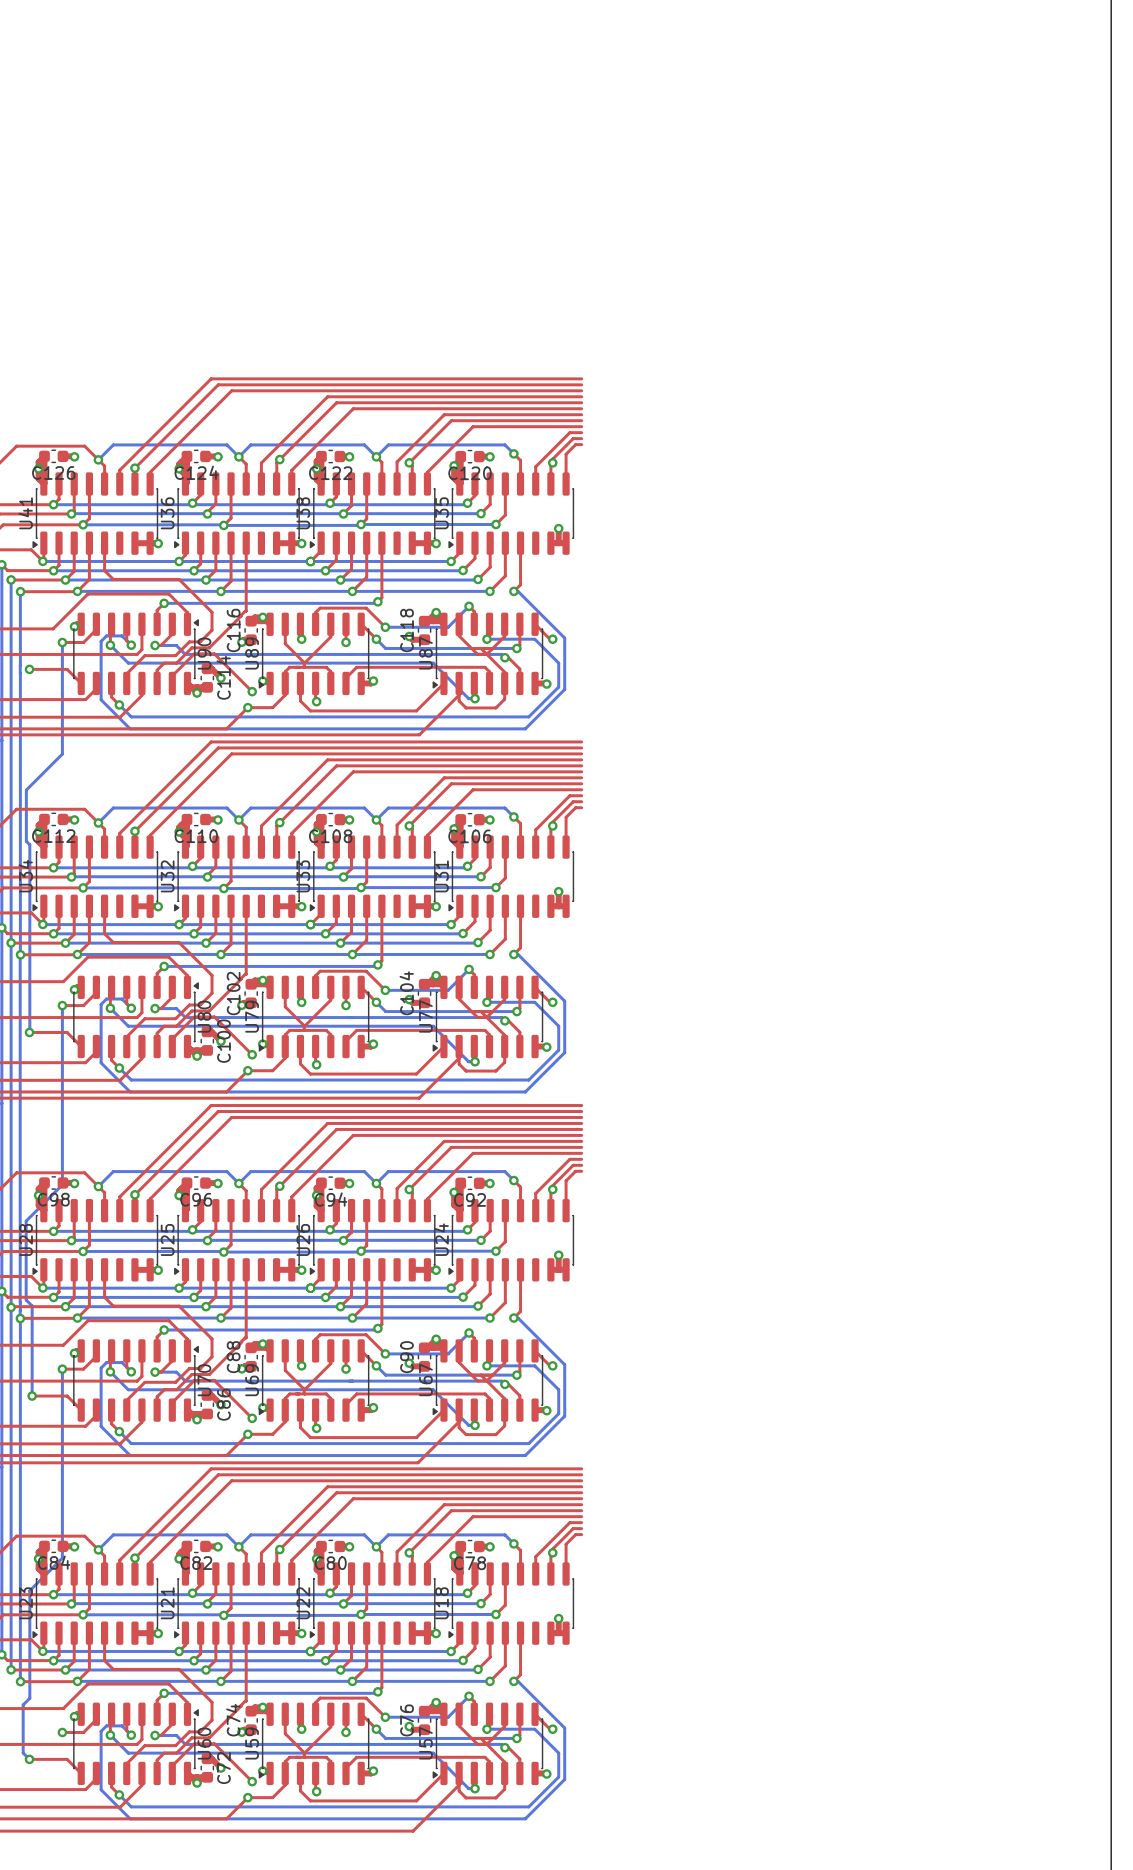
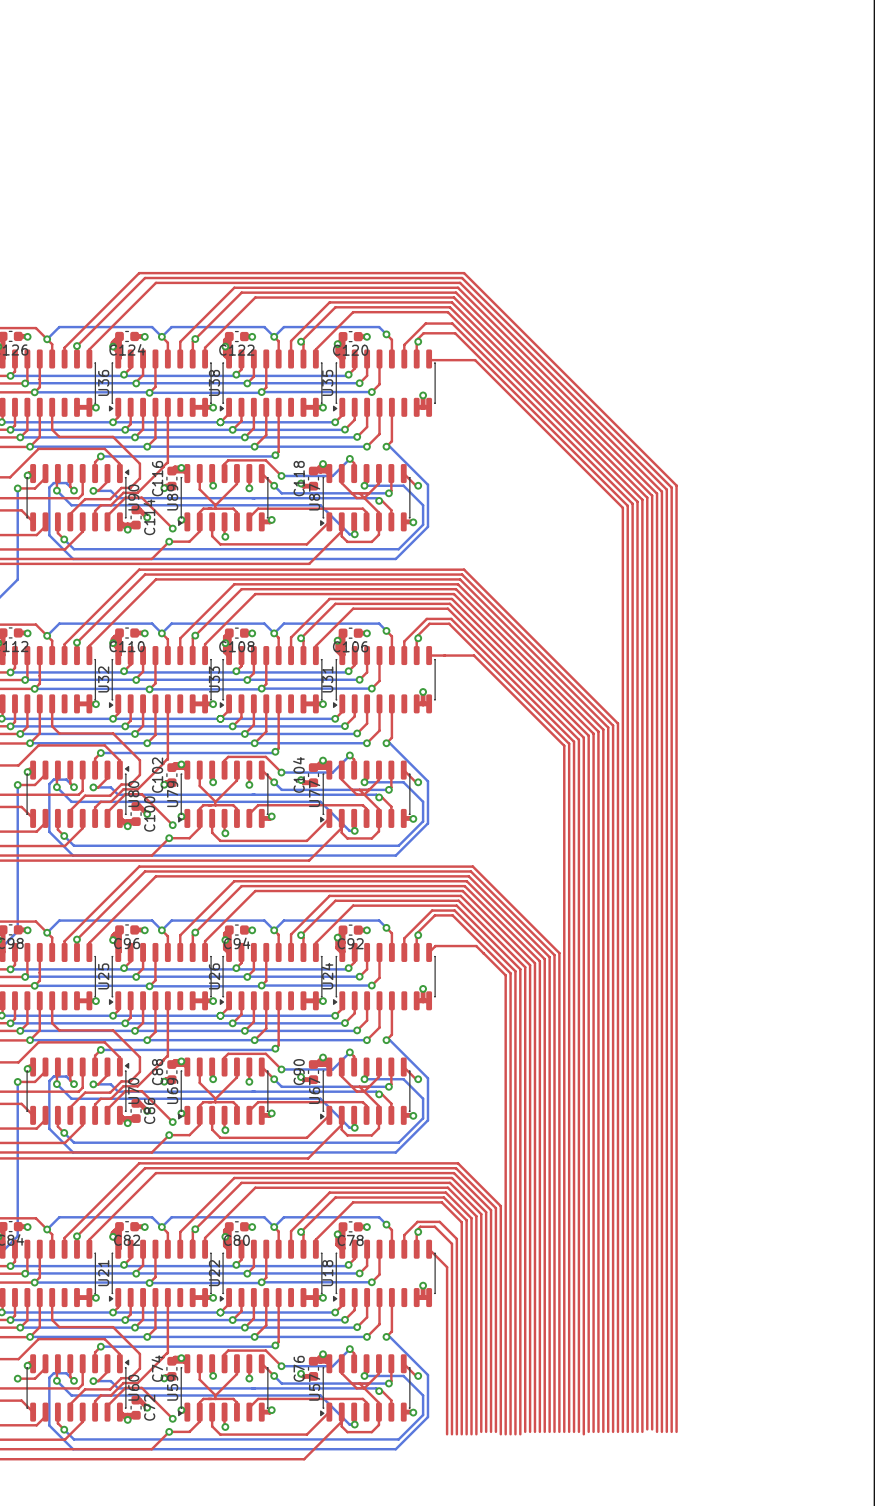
top track: none -> (441, 273) (464, 273) (676, 485) (676, 1431)
top track: none -> (441, 278) (462, 278) (671, 487) (671, 1431)
top track: none -> (441, 282) (460, 282) (666, 489) (666, 1431)
top track: none -> (441, 287) (458, 287) (661, 491) (661, 1431)
top track: none -> (441, 292) (456, 292) (657, 493) (657, 1431)
top track: none -> (441, 297) (453, 297) (652, 495) (652, 1429)
top track: none -> (441, 302) (451, 302) (647, 497) (647, 1429)
top track: none -> (441, 307) (449, 307) (642, 499) (642, 1431)
top track: none -> (441, 312) (447, 312) (637, 501) (637, 1431)
top track: (581, 432) (569, 432) (561, 440) -> (632, 1431) (632, 503) (452, 323) (425, 323)
top track: (581, 438) (573, 438) (559, 452) -> (627, 1431) (627, 505) (455, 333) (423, 333)
top track: (581, 444) (575, 444) (566, 454) (566, 484) -> (622, 1431) (622, 507) (475, 360) (429, 358)
top track: none -> (441, 569) (464, 569) (617, 723) (617, 1431)
top track: none -> (441, 574) (462, 574) (613, 725) (613, 1431)
top track: none -> (441, 579) (460, 579) (608, 727) (608, 1431)
top track: none -> (441, 584) (458, 584) (603, 729) (603, 1431)
top track: none -> (441, 589) (456, 589) (598, 731) (598, 1431)
top track: none -> (441, 594) (453, 594) (593, 733) (593, 1431)
top track: none -> (441, 598) (451, 598) (588, 735) (588, 1431)
top track: none -> (441, 603) (449, 603) (583, 737) (583, 1434)
top track: none -> (441, 608) (447, 608) (578, 739) (578, 1431)
top track: (581, 795) (569, 795) (563, 802) -> (574, 1431) (574, 741) (451, 618) (426, 618)
top track: (581, 801) (573, 801) (566, 808) -> (569, 1431) (569, 743) (449, 623) (429, 623)
top track: (581, 807) (575, 807) (566, 817) (566, 847) -> (564, 1431) (564, 745) (474, 655) (429, 655)
top track: none -> (441, 866) (472, 866) (559, 953) (559, 1431)
top track: none -> (441, 871) (470, 871) (554, 955) (554, 1431)
top track: none -> (441, 876) (468, 876) (549, 957) (549, 1431)
top track: none -> (441, 881) (466, 881) (544, 959) (544, 1431)
top track: none -> (441, 886) (464, 886) (539, 961) (539, 1431)
top track: none -> (441, 891) (462, 891) (534, 963) (534, 1431)
top track: none -> (441, 895) (460, 895) (530, 965) (530, 1431)
top track: none -> (441, 900) (458, 900) (525, 967) (525, 1431)
top track: none -> (441, 905) (456, 905) (520, 969) (520, 1434)
top track: none -> (441, 910) (454, 910) (515, 971) (515, 1434)
top track: none -> (441, 915) (452, 915) (510, 973) (510, 1434)
top track: (581, 1171) (575, 1171) (566, 1180) (566, 1210) -> (483, 953) (476, 946) (435, 946) (429, 952)
top track: none -> (483, 953) (505, 975) (505, 1434)
top track: none -> (441, 1163) (458, 1163) (500, 1206) (500, 1434)
top track: none -> (441, 1168) (456, 1168) (495, 1208) (495, 1431)
top track: none -> (441, 1173) (453, 1173) (491, 1210) (491, 1431)
top track: none -> (441, 1177) (451, 1177) (486, 1212) (486, 1431)
top track: none -> (441, 1182) (449, 1182) (481, 1214) (481, 1431)
top track: none -> (441, 1187) (447, 1187) (476, 1216) (476, 1434)
top track: none -> (441, 1192) (445, 1192) (471, 1218) (471, 1434)
top track: none -> (441, 1197) (466, 1220) (466, 1434)
top track: none -> (441, 1202) (461, 1222) (461, 1434)
top track: (581, 1522) (569, 1522) (551, 1540) -> (456, 1434) (456, 1238) (439, 1221) (417, 1221)
top track: (581, 1528) (573, 1528) (555, 1546) -> (451, 1434) (451, 1243) (434, 1226) (420, 1226)
top track: (581, 1534) (575, 1534) (566, 1544) (566, 1573) -> (447, 1434) (447, 1267) (429, 1249)

